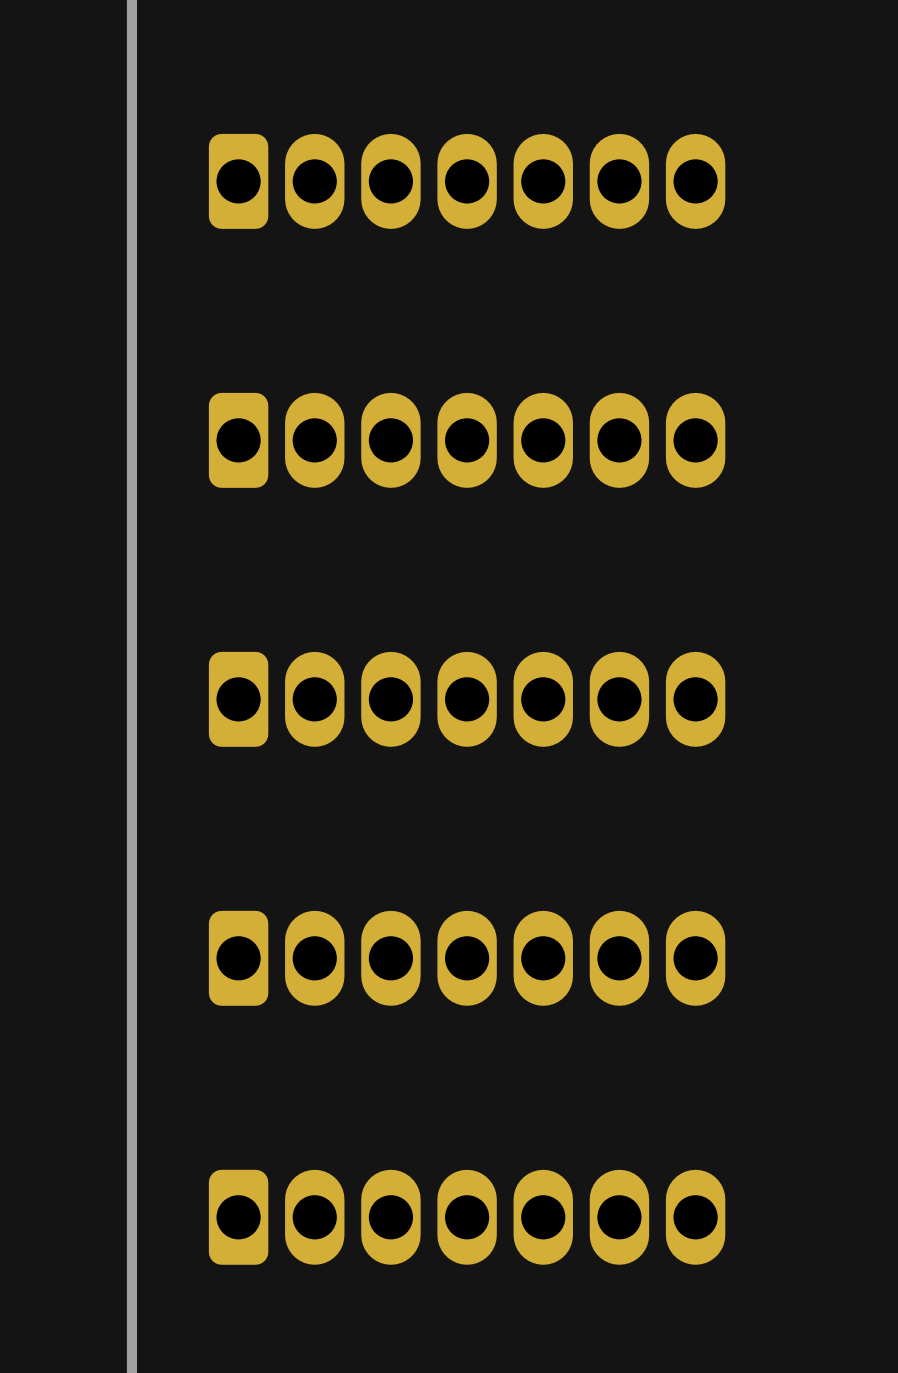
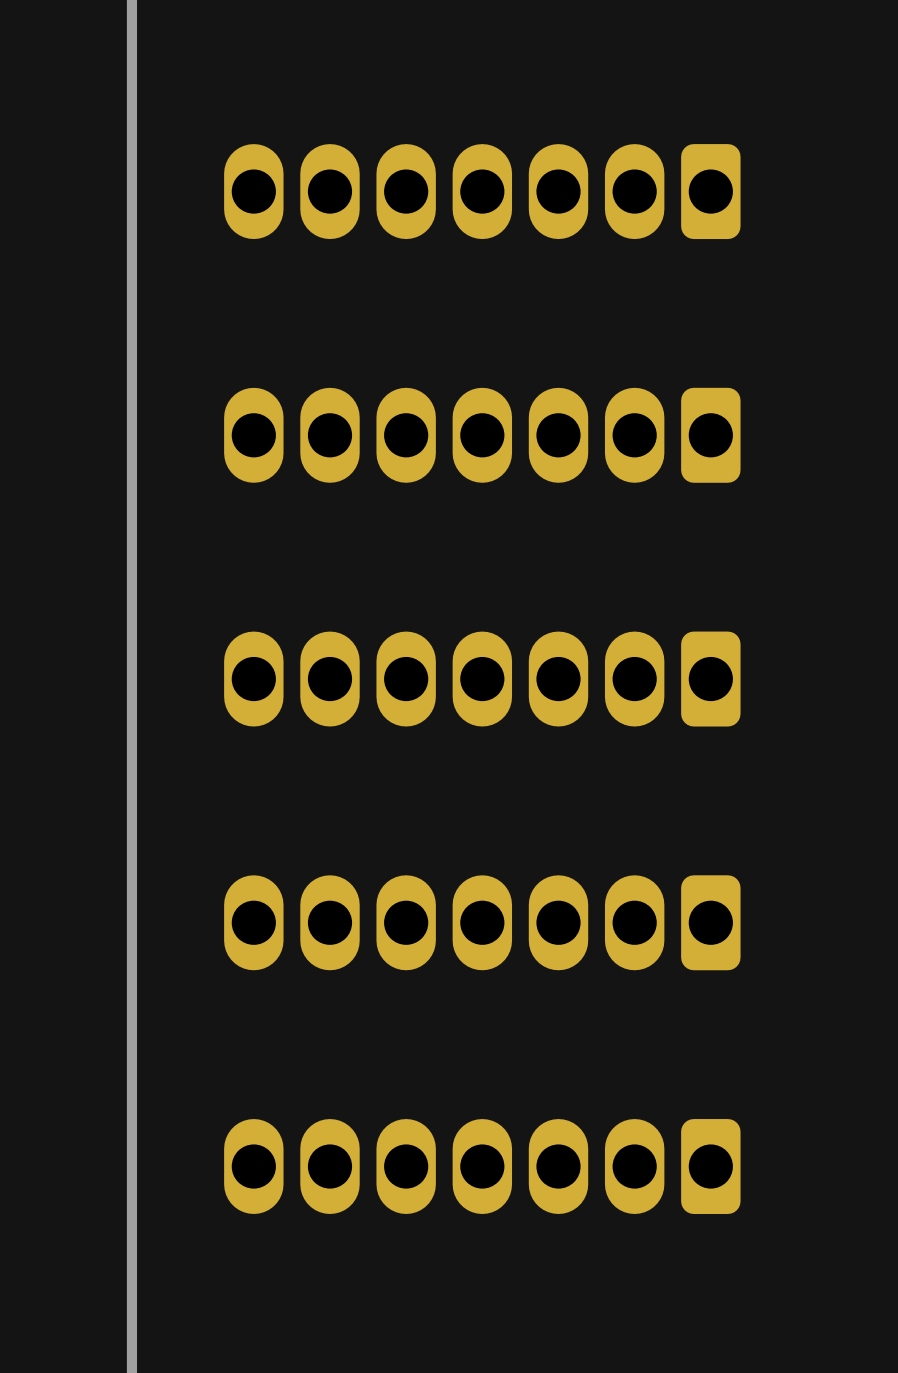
part rotation: 0° (467, 181) -> 180° (482, 191)
part rotation: 0° (467, 440) -> 180° (482, 435)
part rotation: 0° (467, 699) -> 180° (482, 679)
part rotation: 0° (467, 958) -> 180° (482, 922)
part rotation: 0° (467, 1217) -> 180° (482, 1166)

